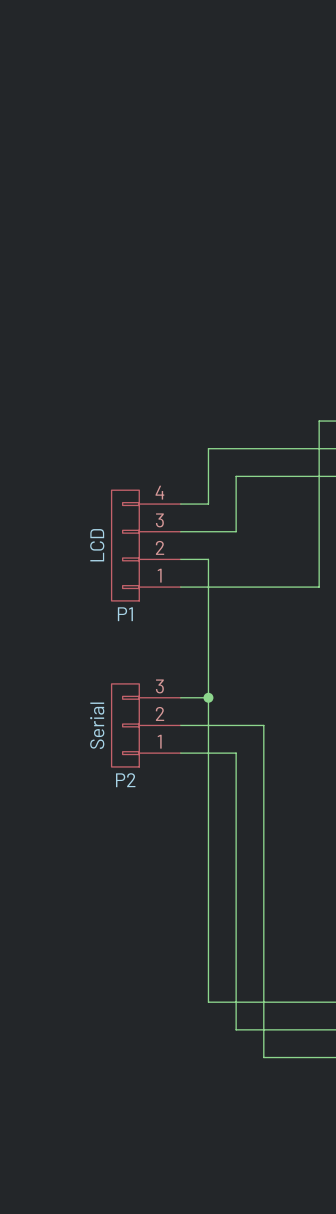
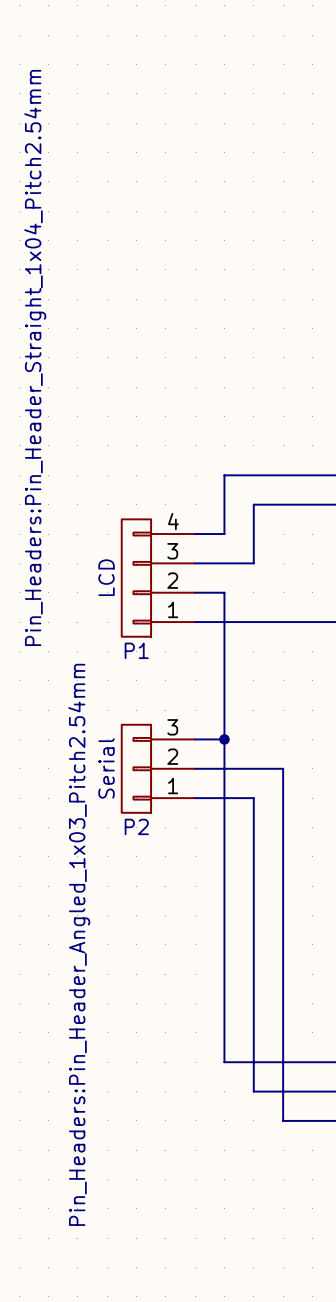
P1 text: none -> Pin_Headers:Pin_Header_Straight_1x04_Pitch2.54mm (35, 357)
P2 text: none -> Pin_Headers:Pin_Header_Angled_1x03_Pitch2.54mm (79, 944)

